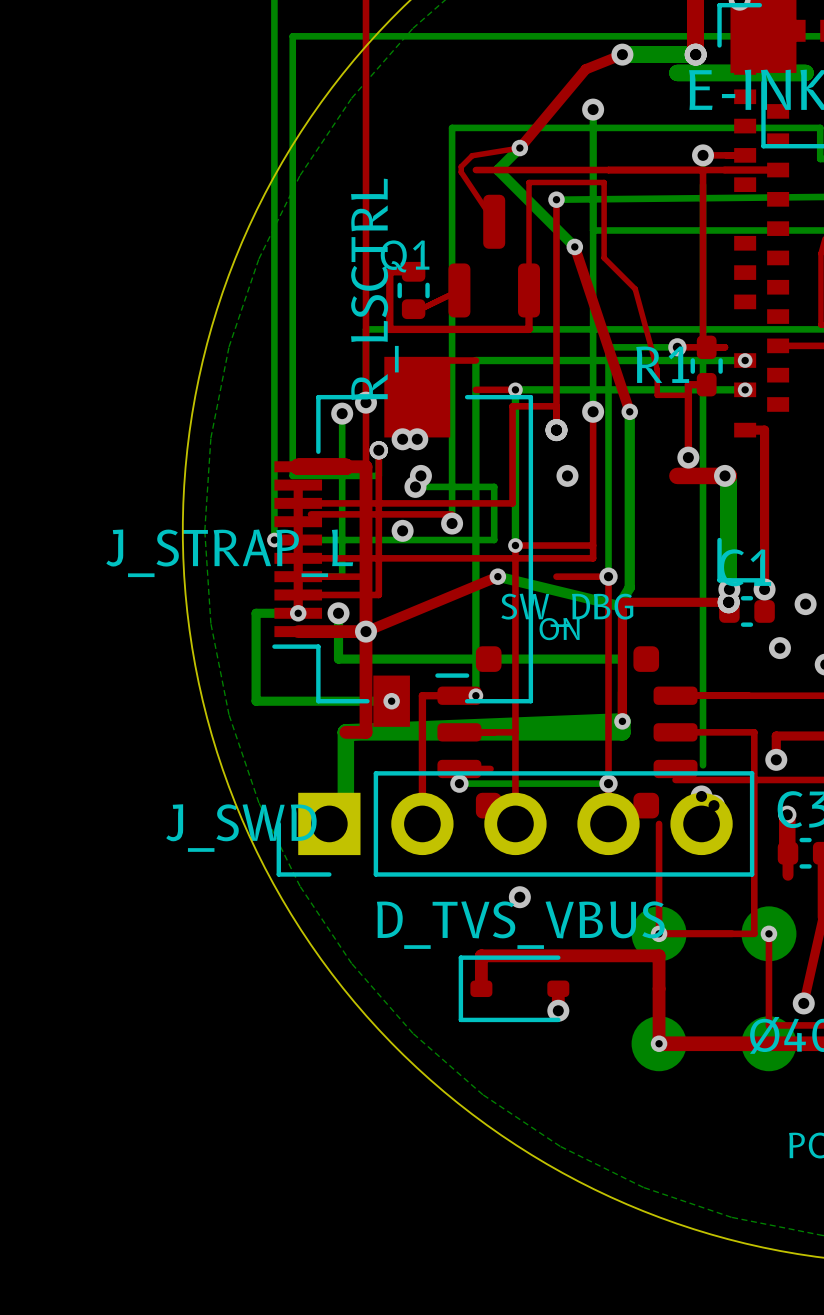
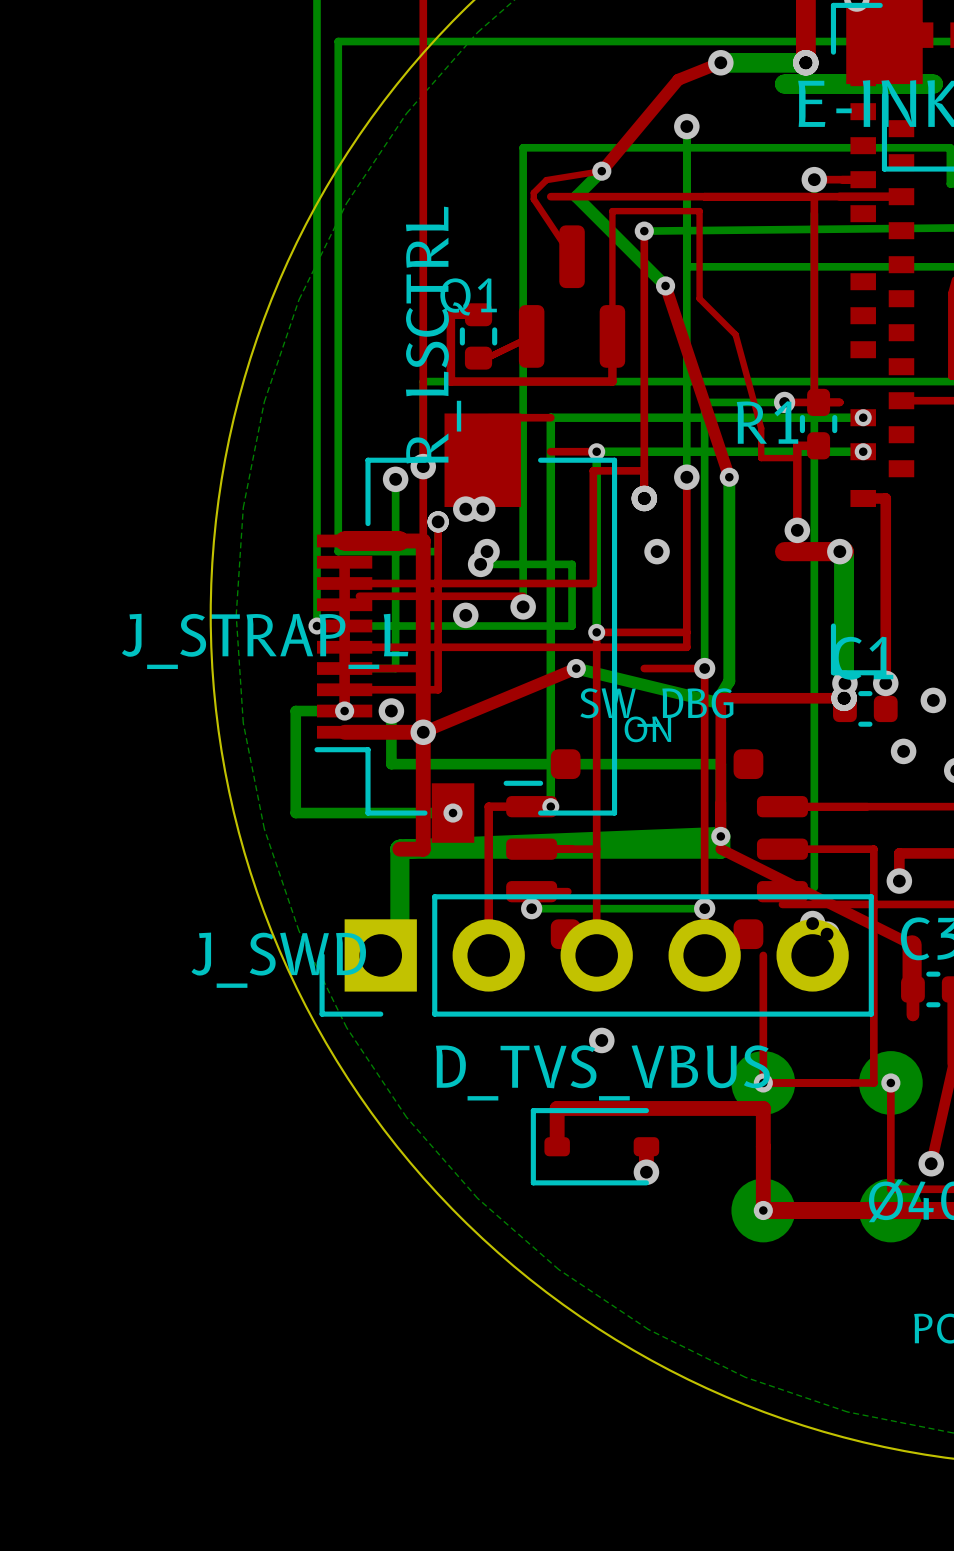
top track: none -> (720, 849) (912, 944)
via: (787, 814) -> none

